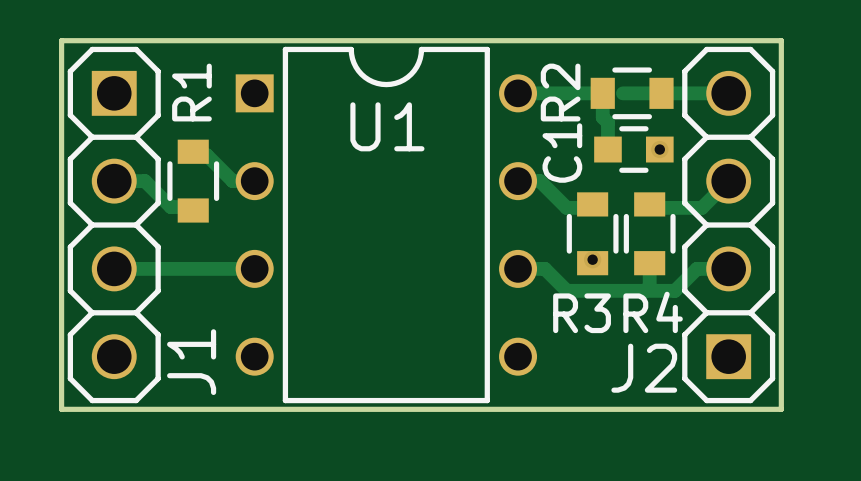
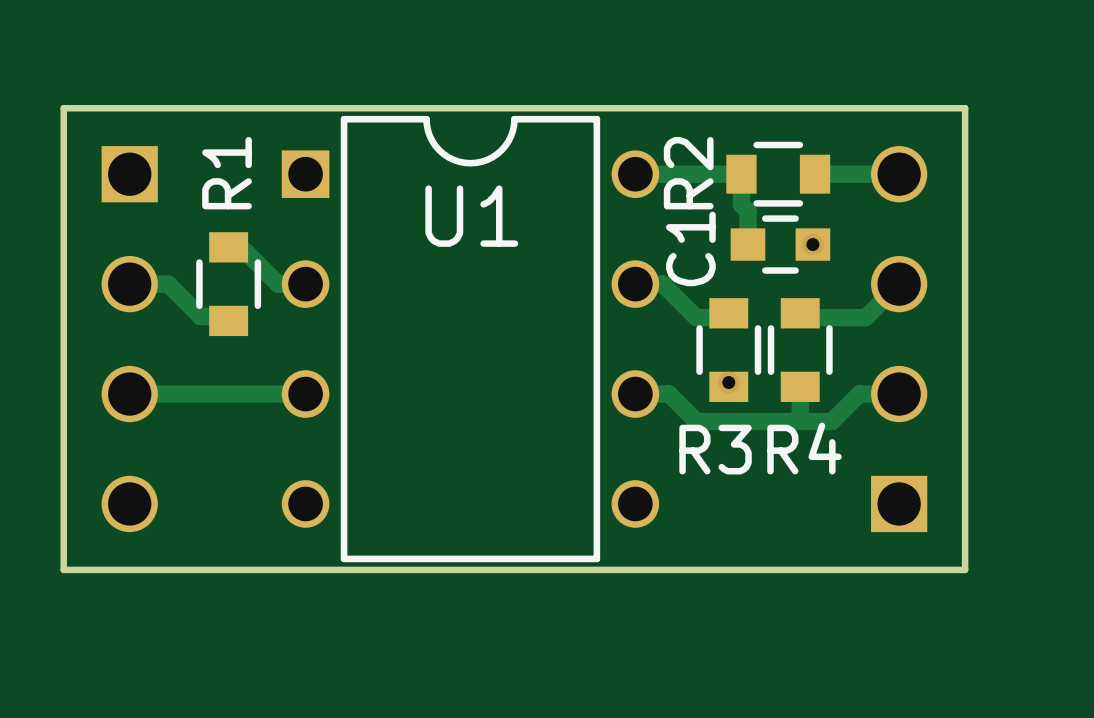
track: (622, 93) (661, 93) -> none
J1 side: top (114, 225) -> bottom (129, 339)
J2 side: top (728, 225) -> bottom (899, 339)

